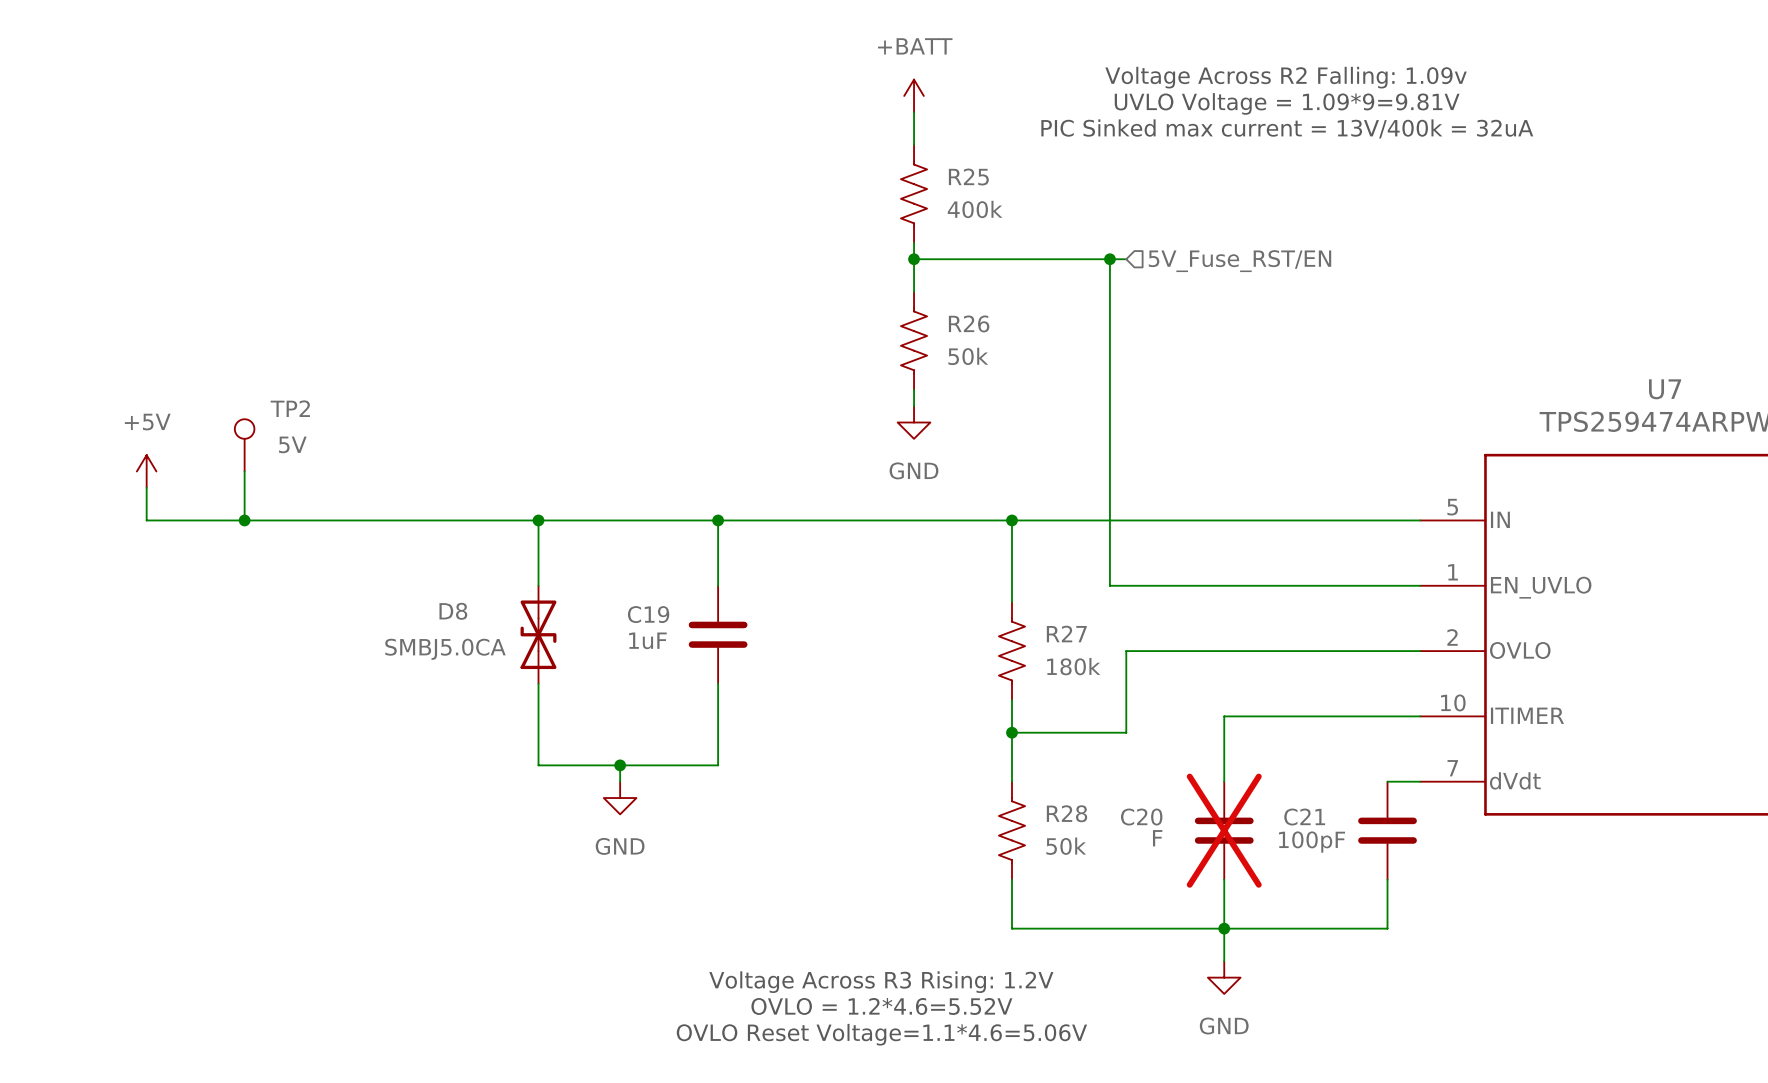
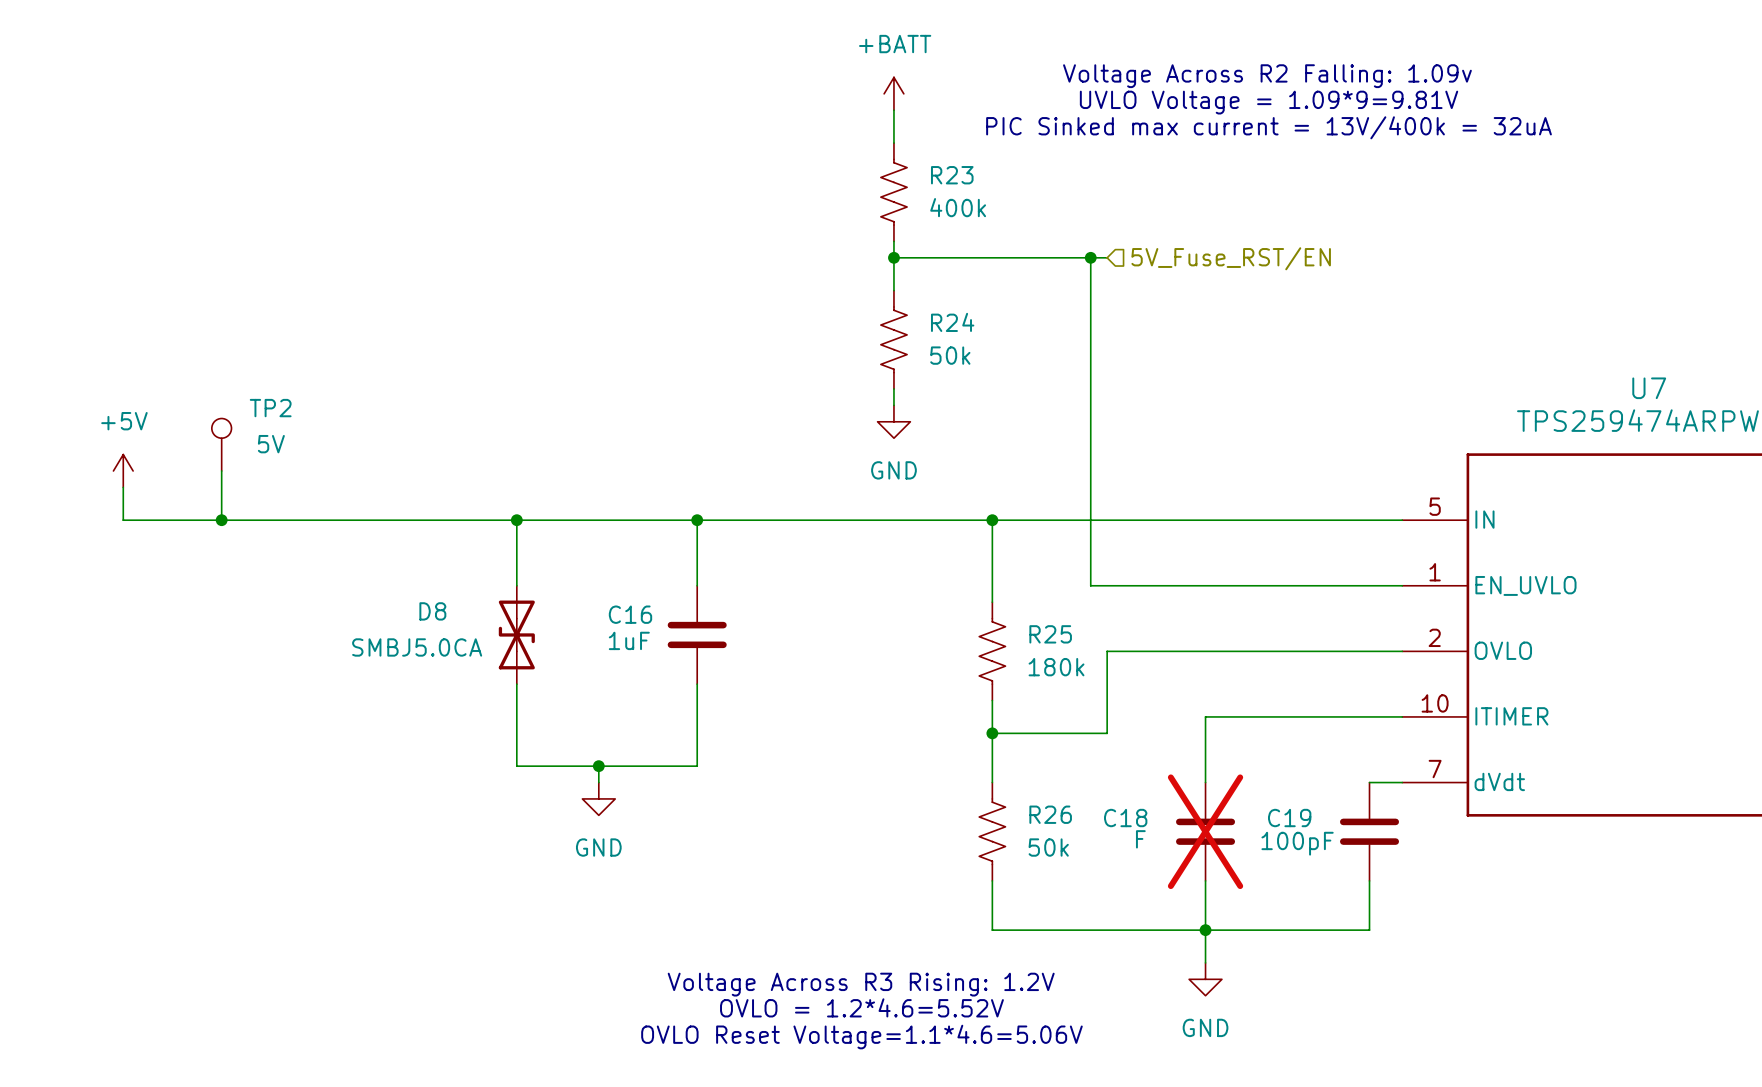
R25 name: R25 (968, 177) -> R23 (952, 175)
R26 name: R26 (969, 323) -> R24 (952, 322)
C19 name: C19 (648, 614) -> C16 (630, 614)
R27 name: R27 (1066, 634) -> R25 (1050, 634)
R28 name: R28 (1067, 813) -> R26 (1050, 814)
C20 name: C20 (1141, 817) -> C18 (1125, 818)
C21 name: C21 (1304, 817) -> C19 (1289, 818)

